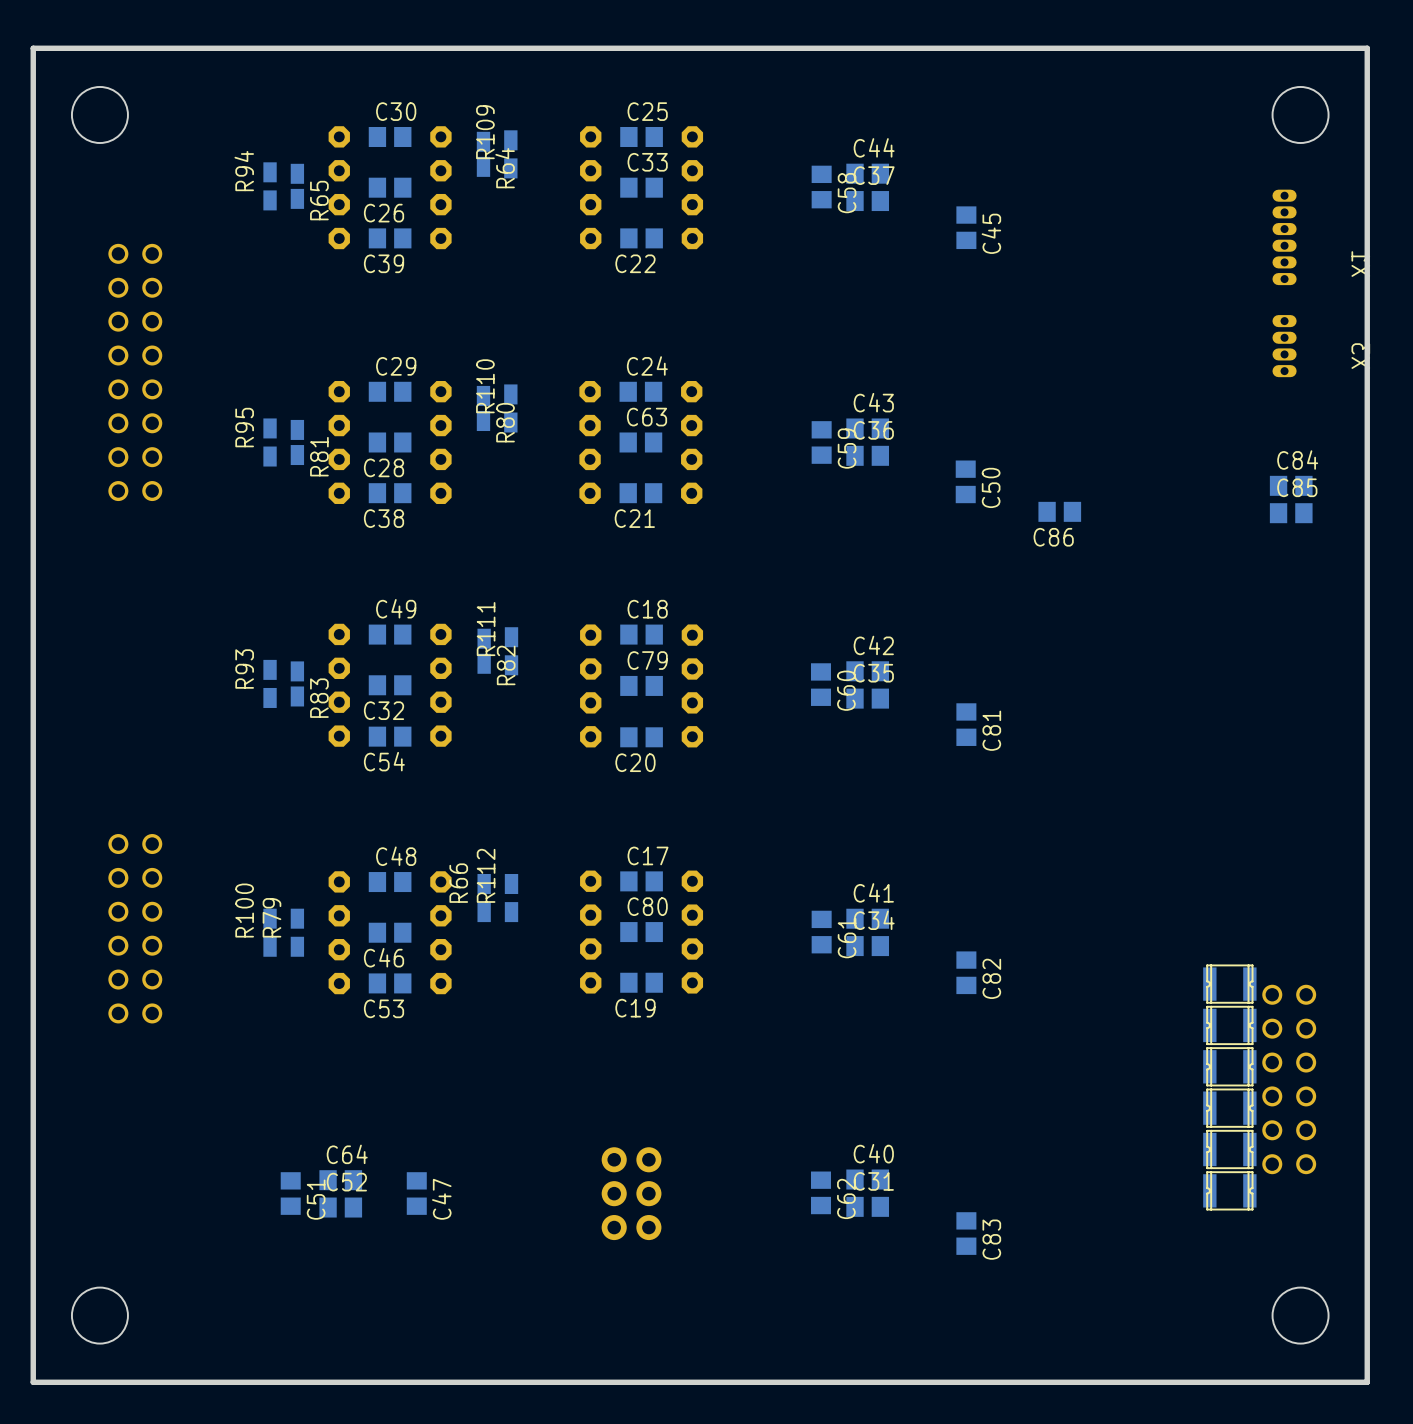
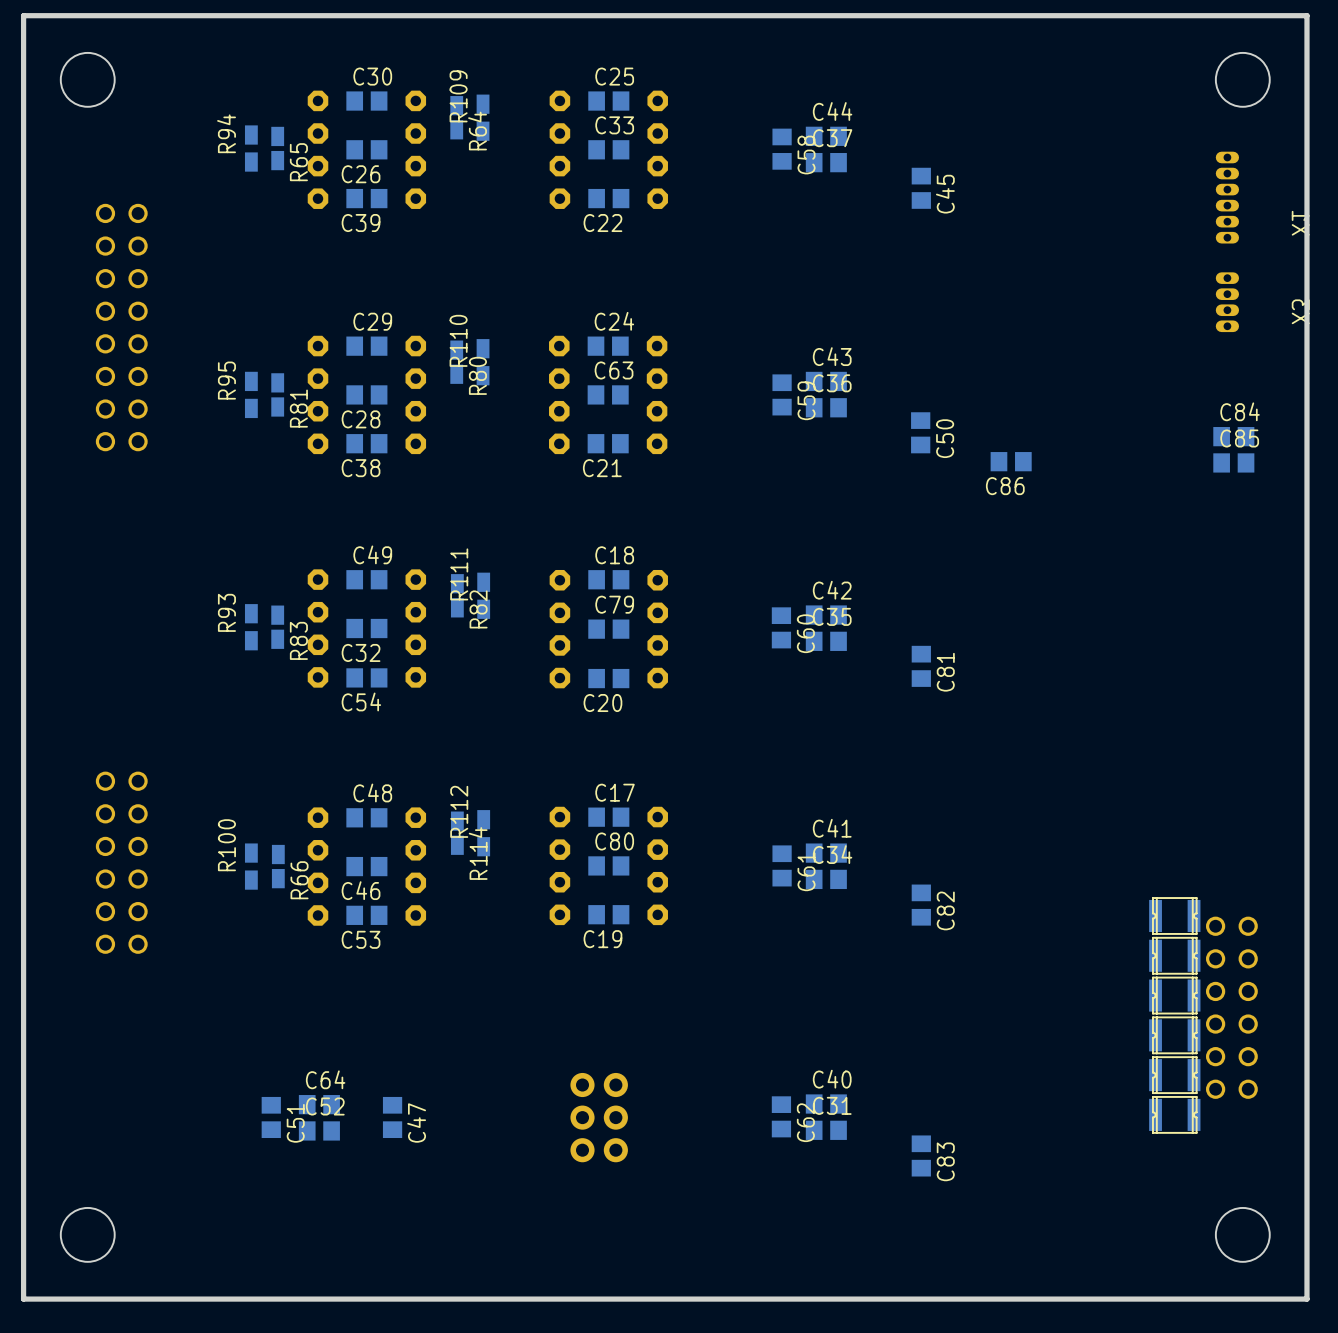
R66 footprint: [477, 874, 491, 923] -> [271, 844, 285, 889]
R66 name position: R66 (458, 883) -> R66 (299, 880)
R114: none -> (457, 833)
R79: (297, 932) -> none

